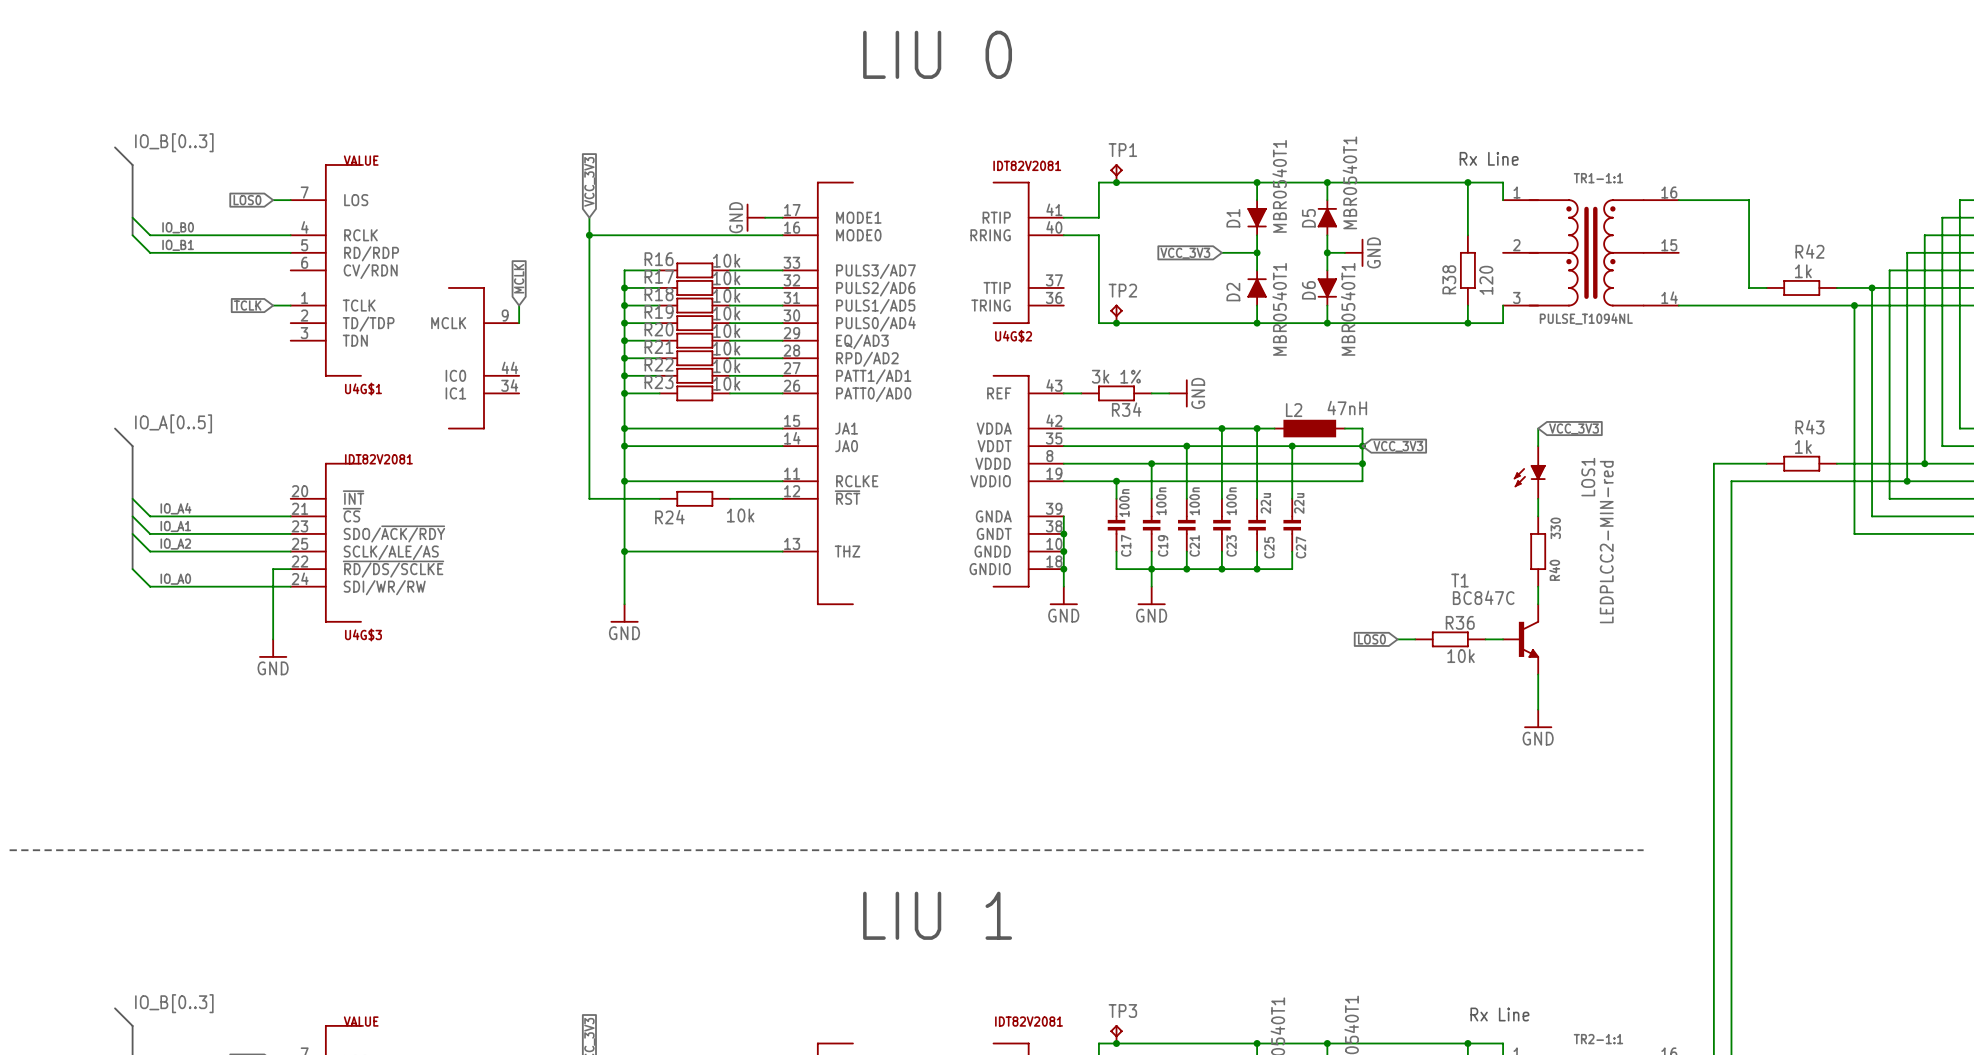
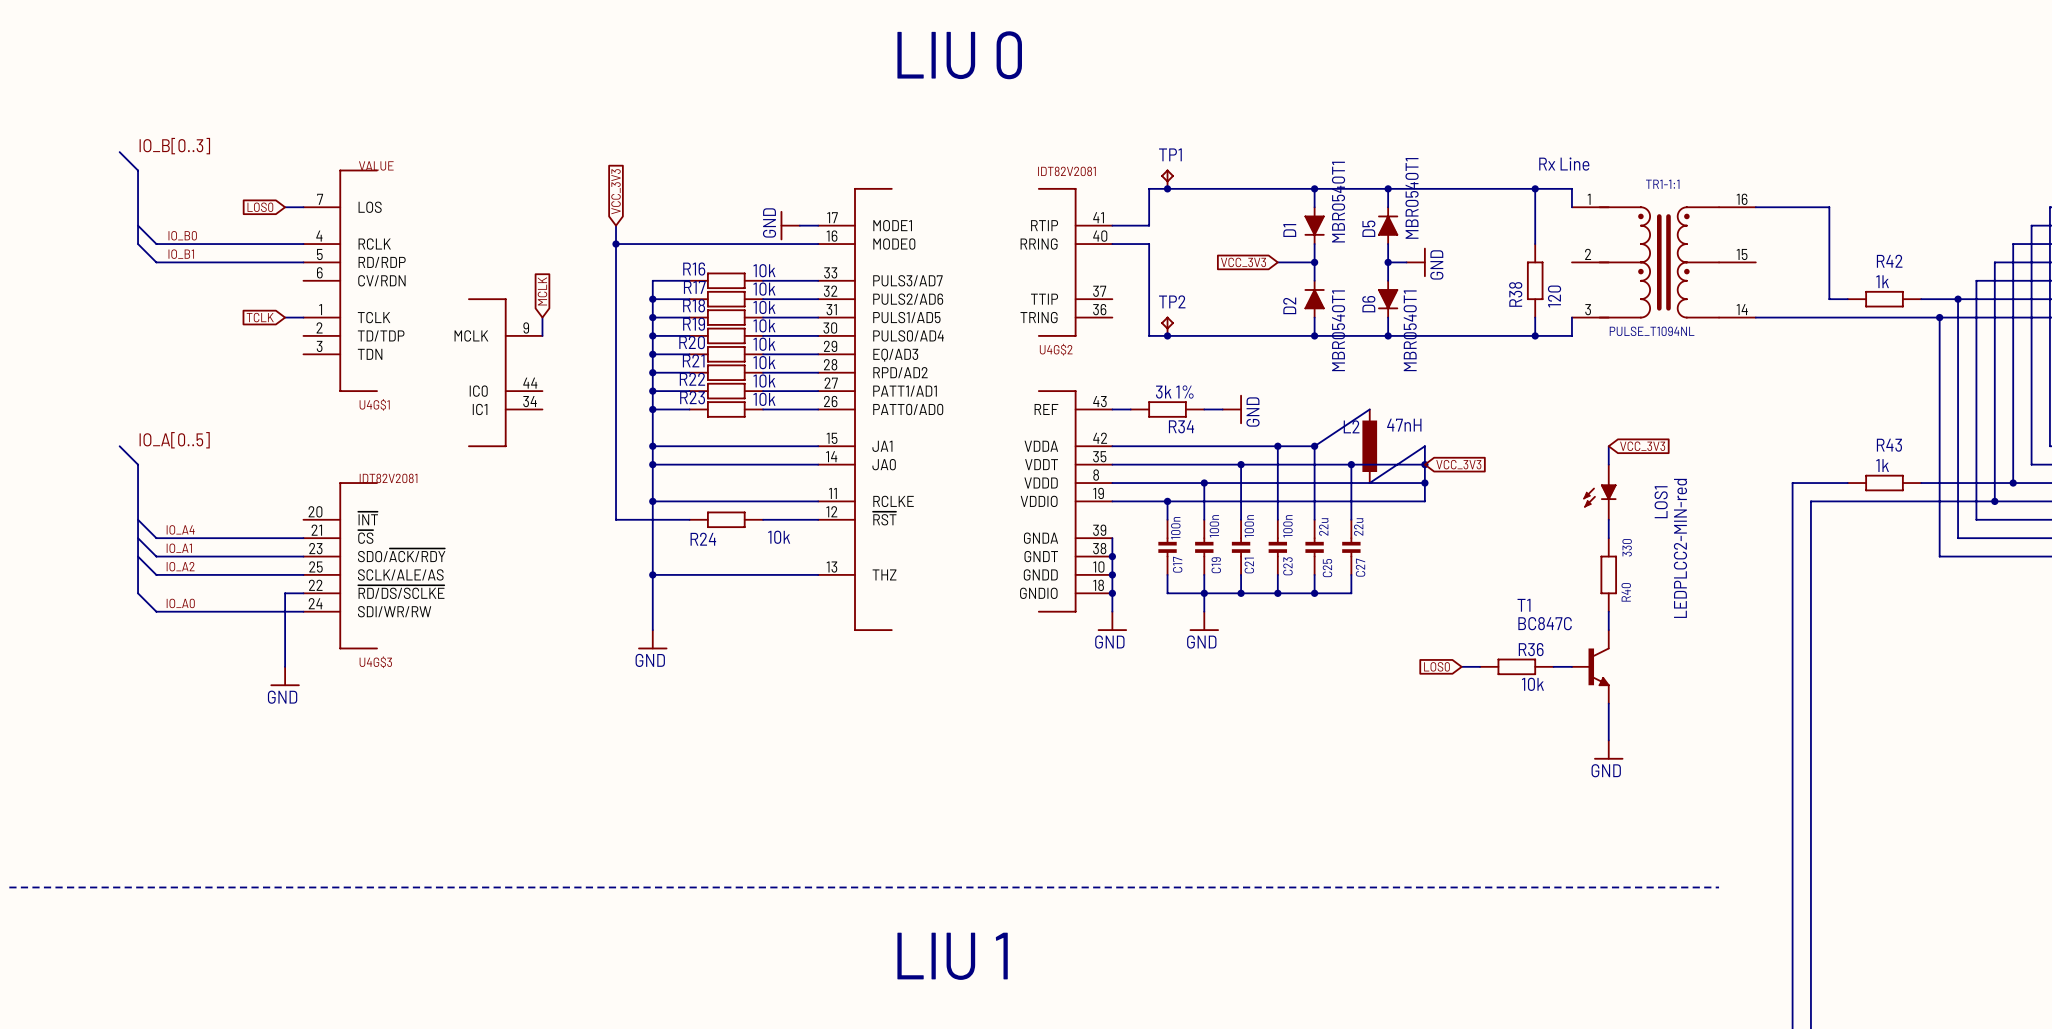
L2 symbol: [1274, 419, 1345, 438] -> [1362, 409, 1378, 484]
wire: (1257, 428) (1274, 428) -> (1314, 446) (1369, 409)
wire: (1344, 428) (1362, 428) -> (1369, 483) (1424, 446)

